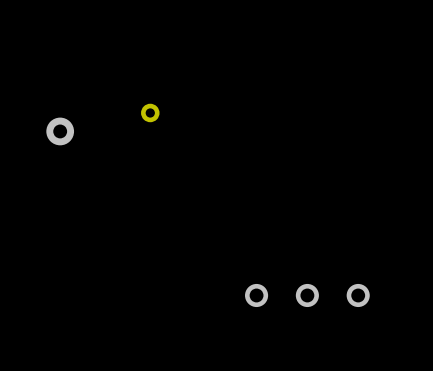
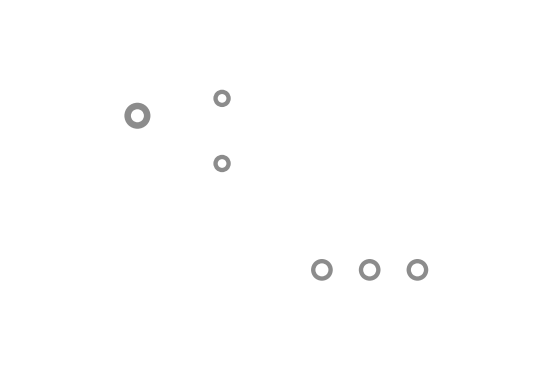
part footprint: [141, 103, 160, 123] -> [213, 89, 231, 173]

